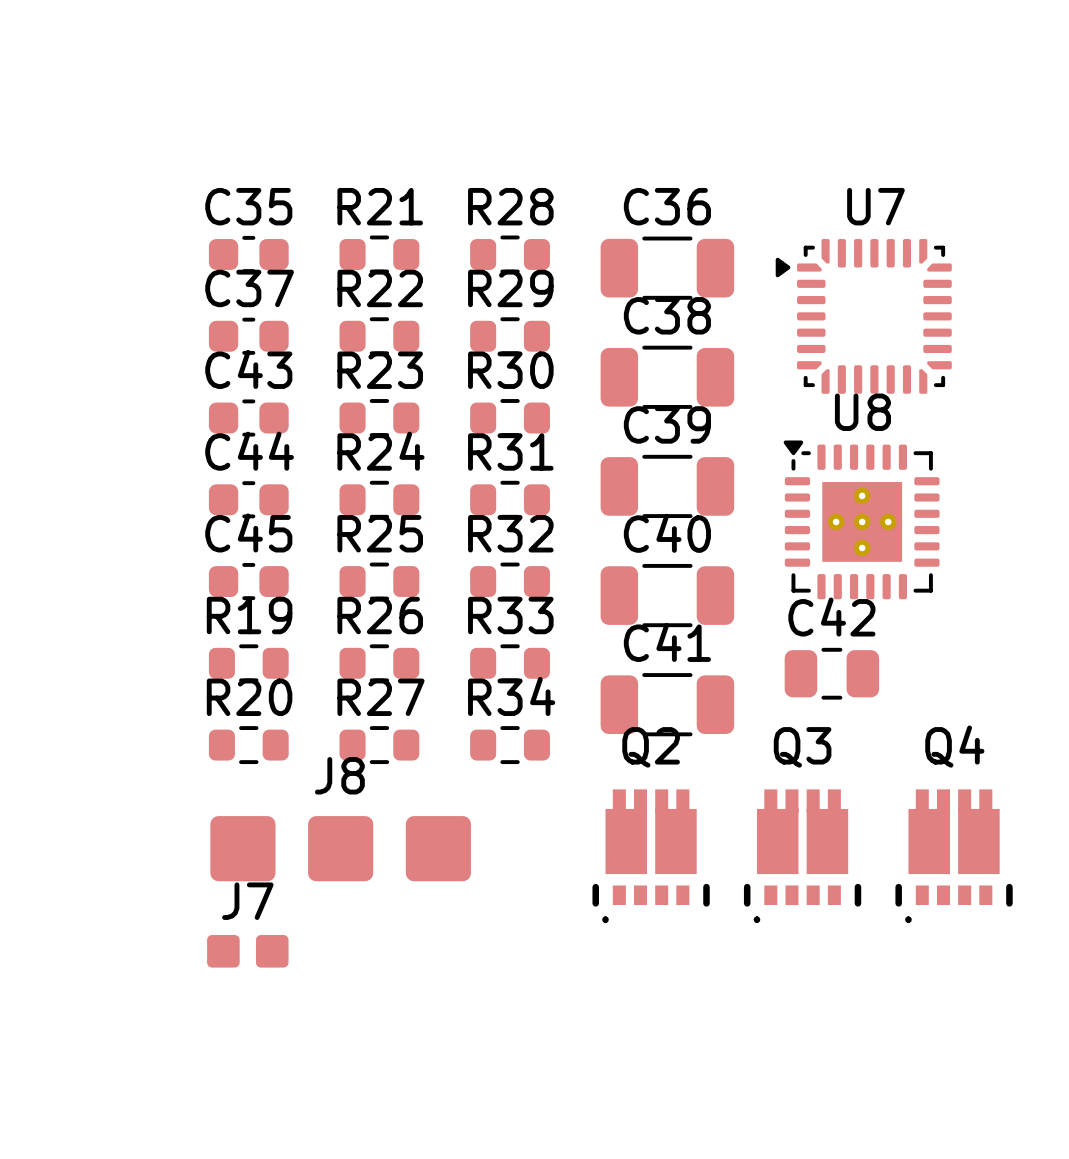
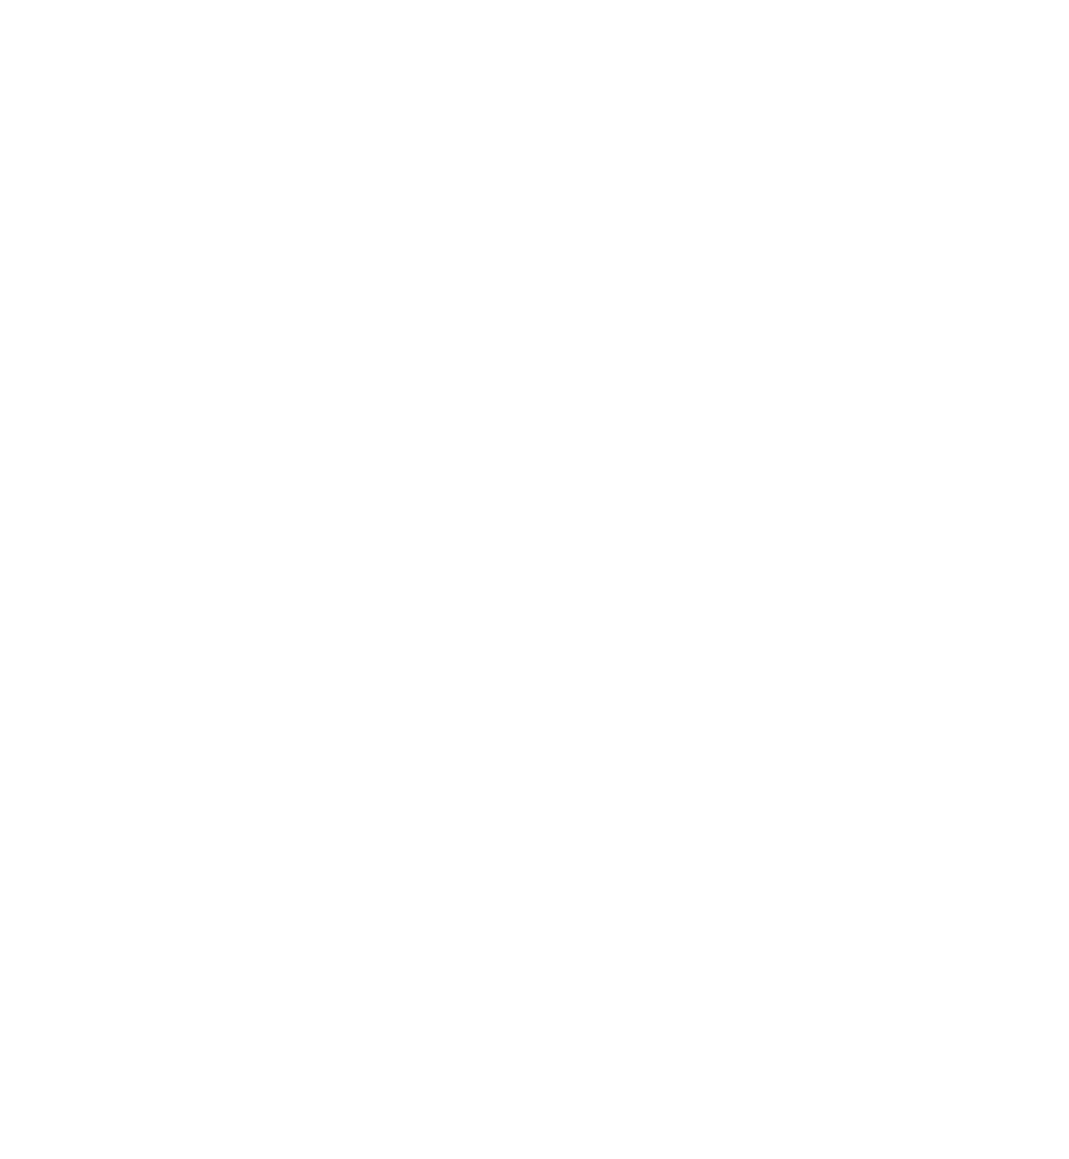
C35: (248, 254) -> none
R21: (379, 254) -> none
R28: (510, 254) -> none
C36: (667, 268) -> none
U7: (863, 316) -> none
C37: (248, 336) -> none
R22: (379, 336) -> none
R29: (510, 336) -> none
C38: (667, 377) -> none
C43: (248, 418) -> none
R23: (379, 418) -> none
R30: (510, 418) -> none
C39: (667, 486) -> none
C44: (248, 499) -> none
R24: (379, 499) -> none
R31: (510, 499) -> none
U8: (861, 519) -> none
C45: (248, 581) -> none
R25: (379, 581) -> none
R32: (510, 581) -> none
C40: (667, 595) -> none
R19: (248, 663) -> none
R26: (379, 663) -> none
R33: (510, 663) -> none
C42: (831, 673) -> none
C41: (667, 704) -> none
R20: (248, 745) -> none
R27: (379, 745) -> none
R34: (510, 745) -> none
J8: (340, 848) -> none
Q2: (651, 856) -> none
Q3: (802, 856) -> none
Q4: (954, 856) -> none
J7: (247, 951) -> none

